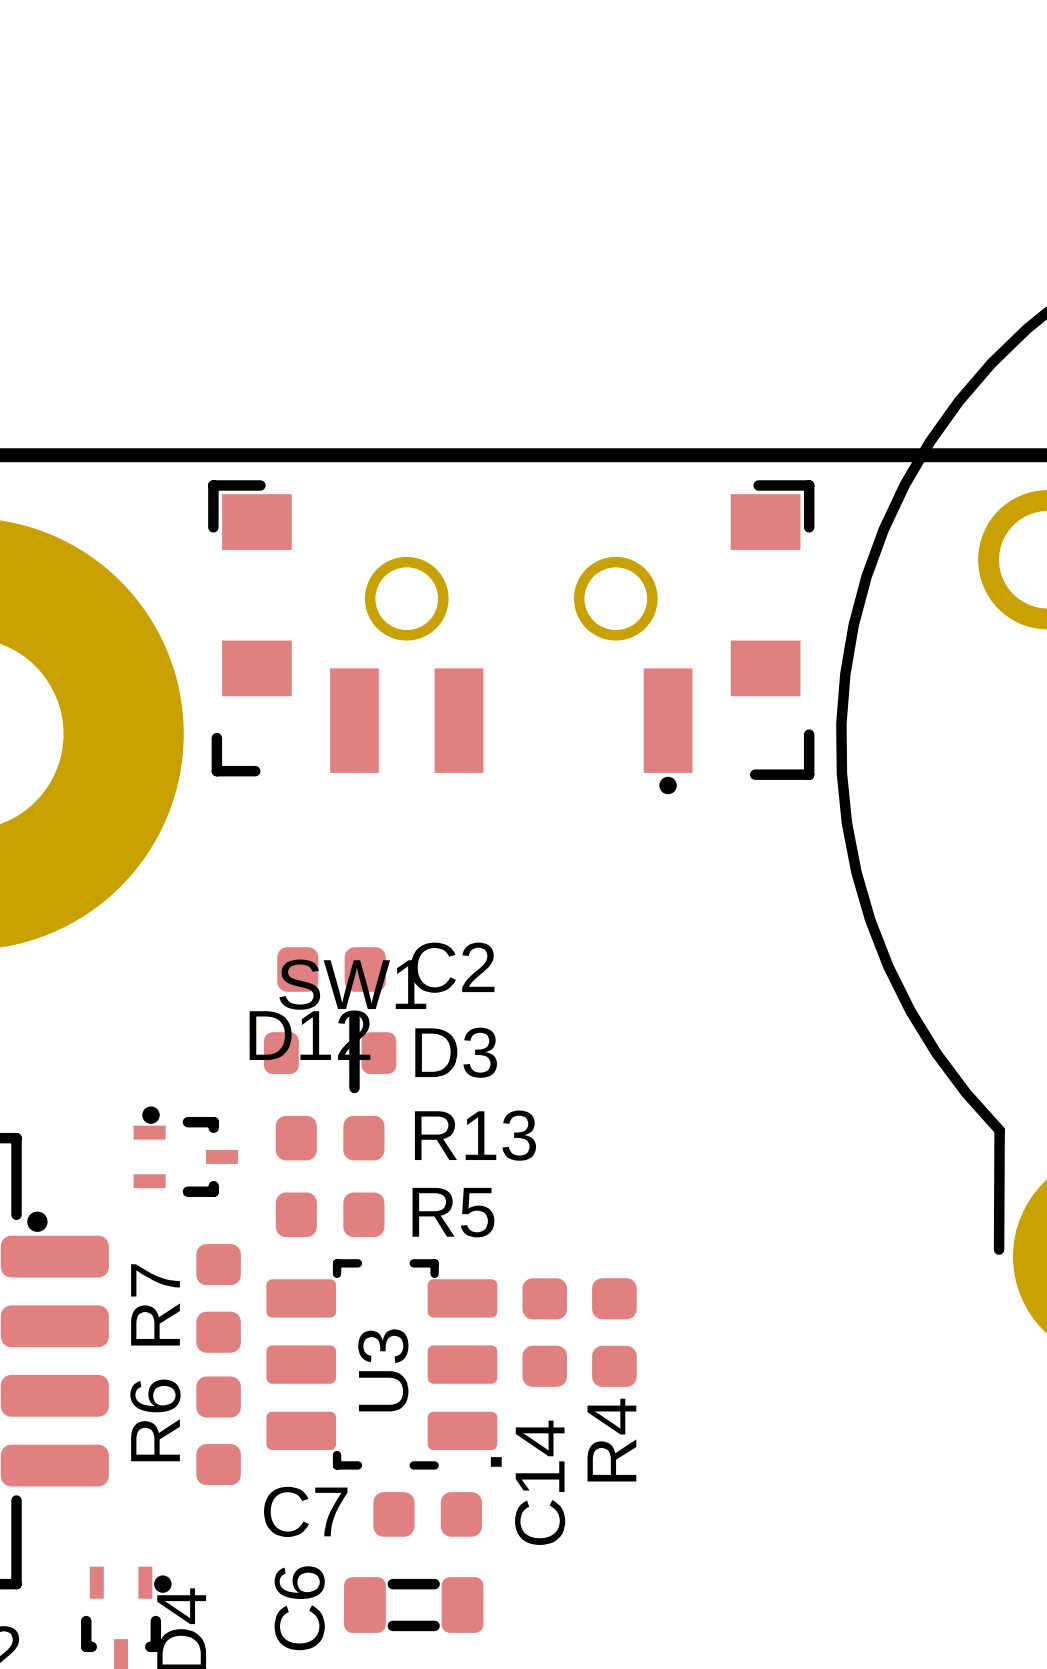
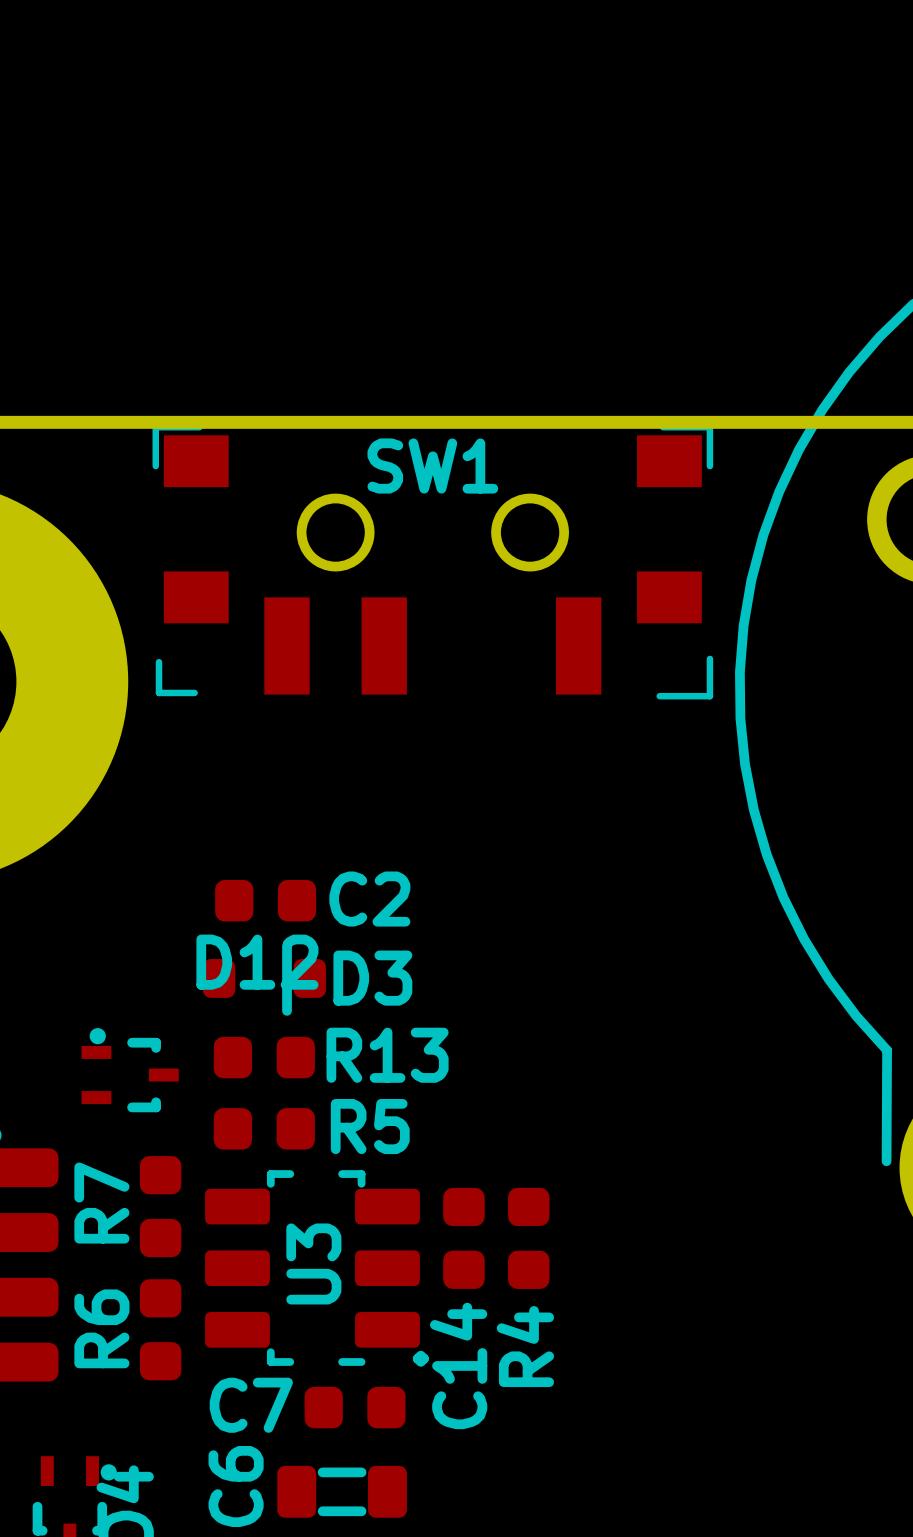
SW1 footprint: [208, 480, 815, 795] -> [152, 423, 714, 700]
SW1 name position: SW1 (352, 984) -> SW1 (432, 466)

